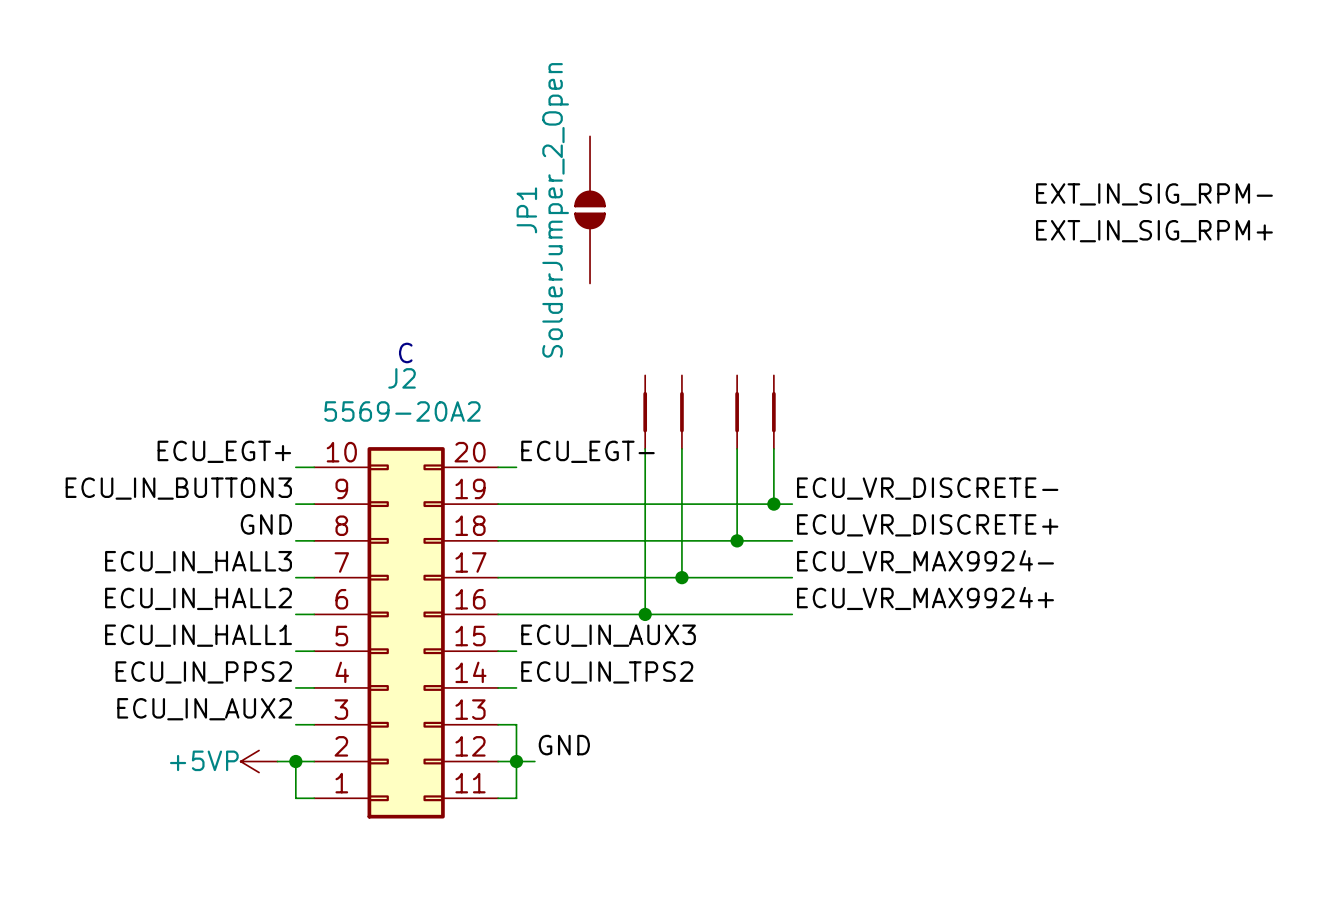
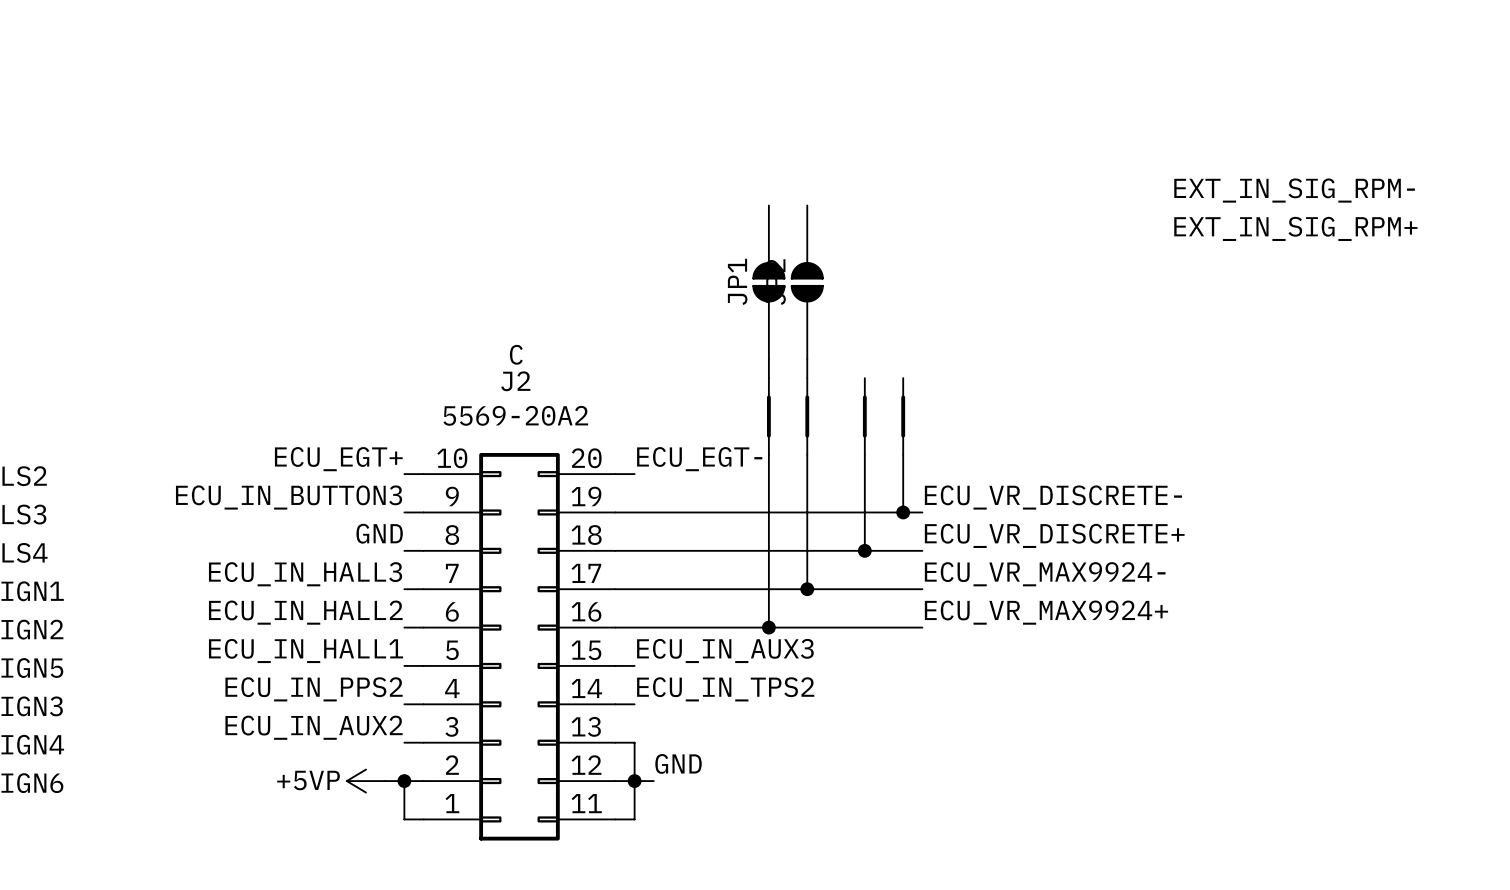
JP1 position: (590, 209) -> (768, 282)
JP1 name position: JP1 (526, 210) -> JP1 (737, 281)
JP1 value: SolderJumper_2_Open (555, 210) -> none
part: none -> (807, 282)
wire: none -> (768, 358) (768, 378)
wire: none -> (807, 358) (807, 378)

